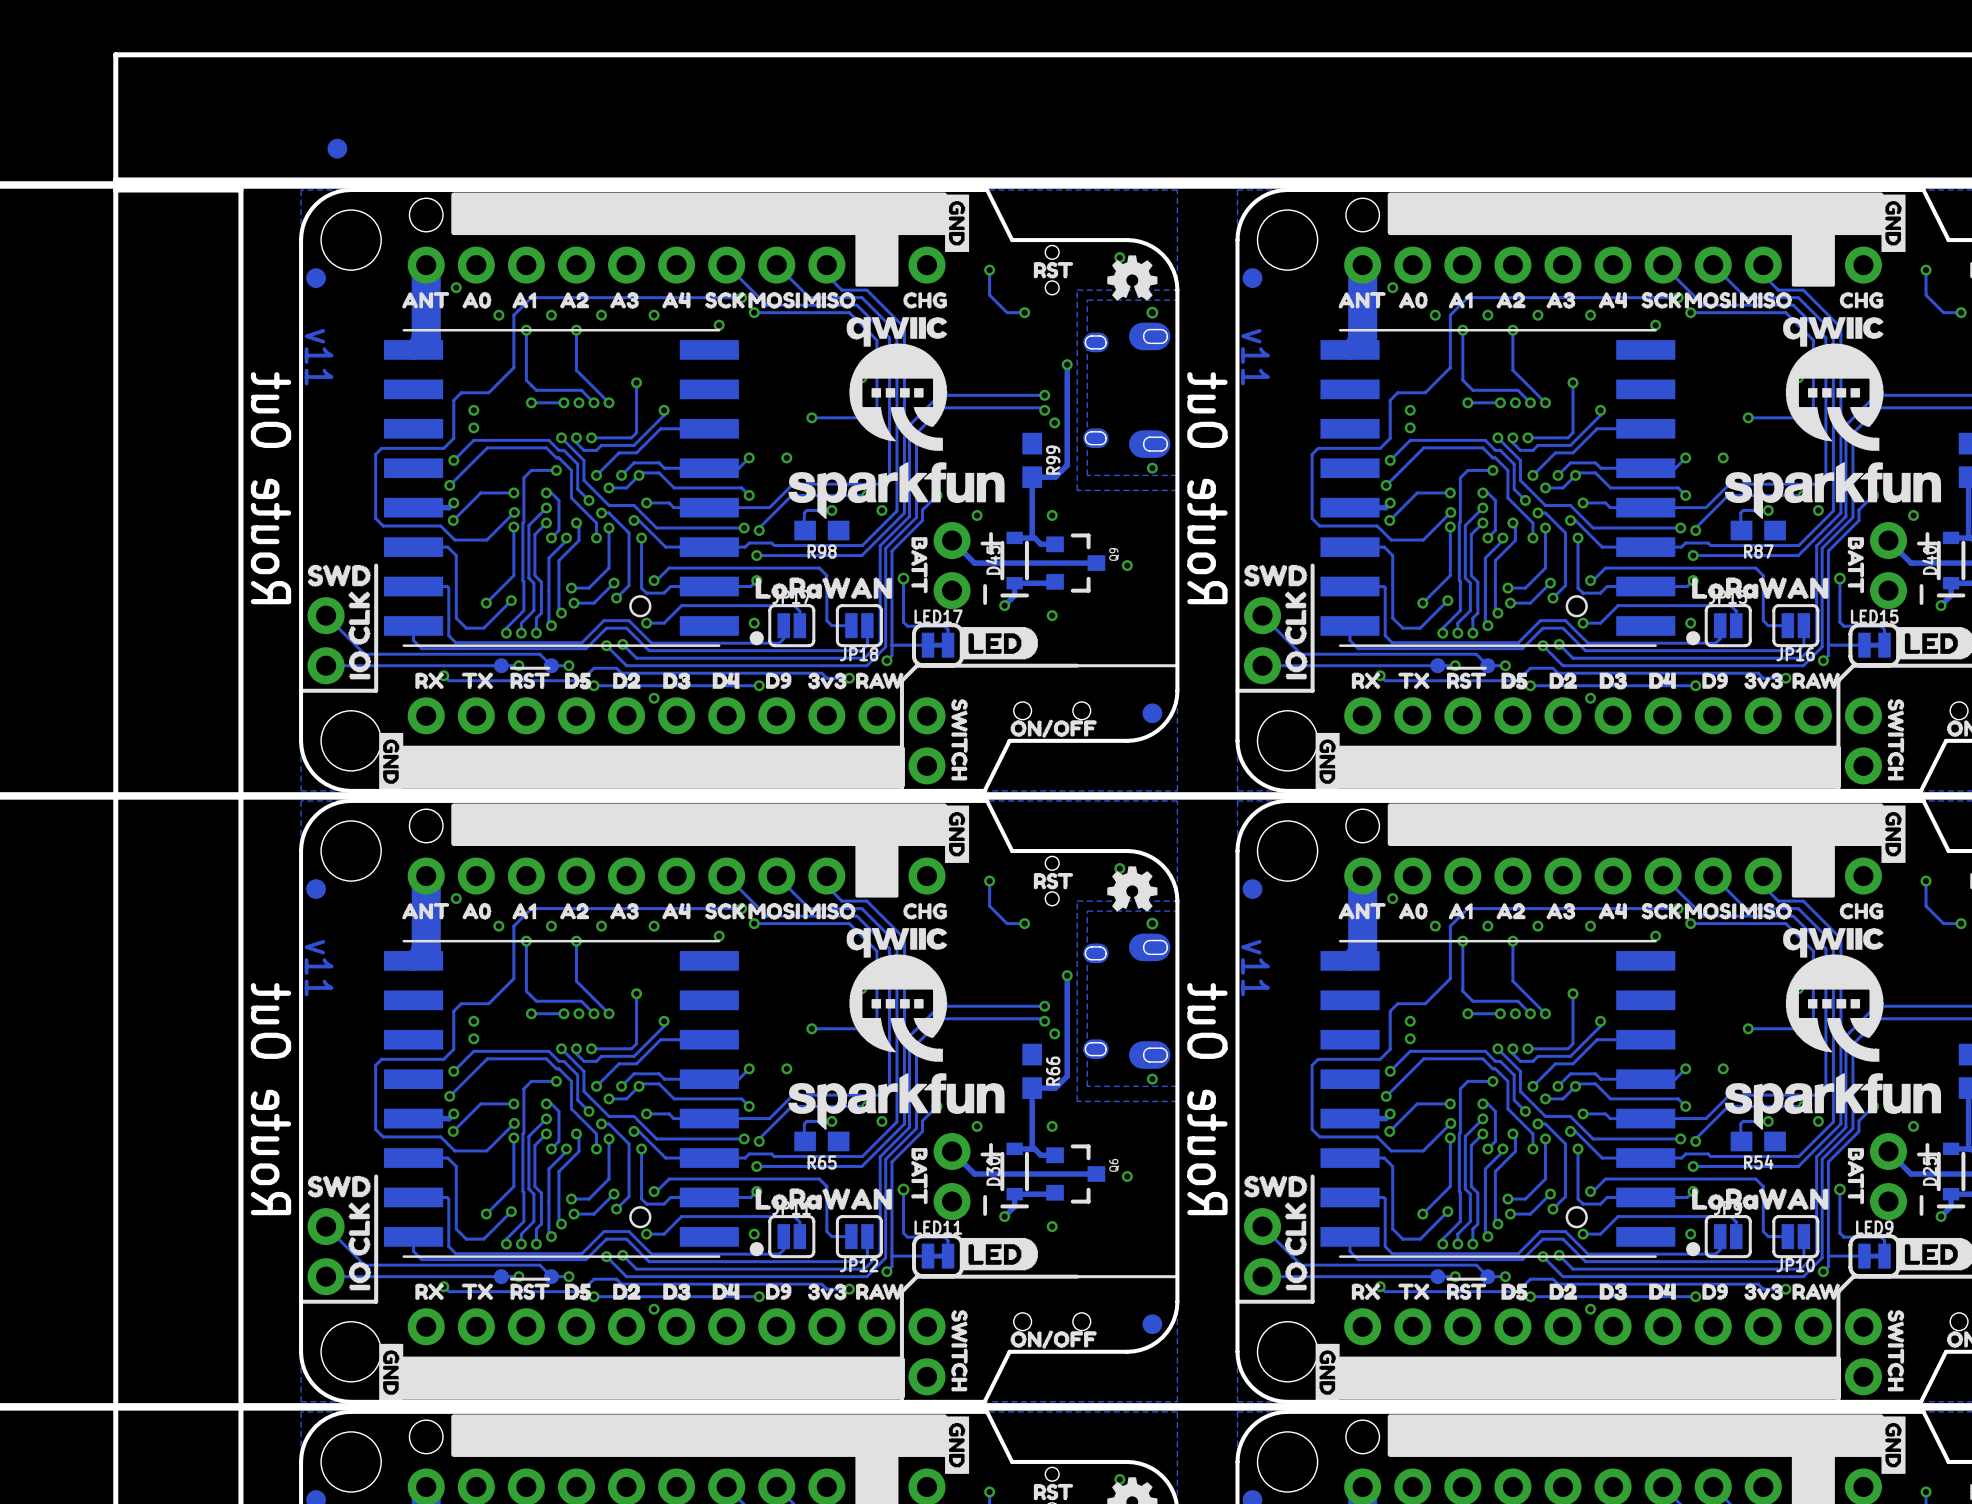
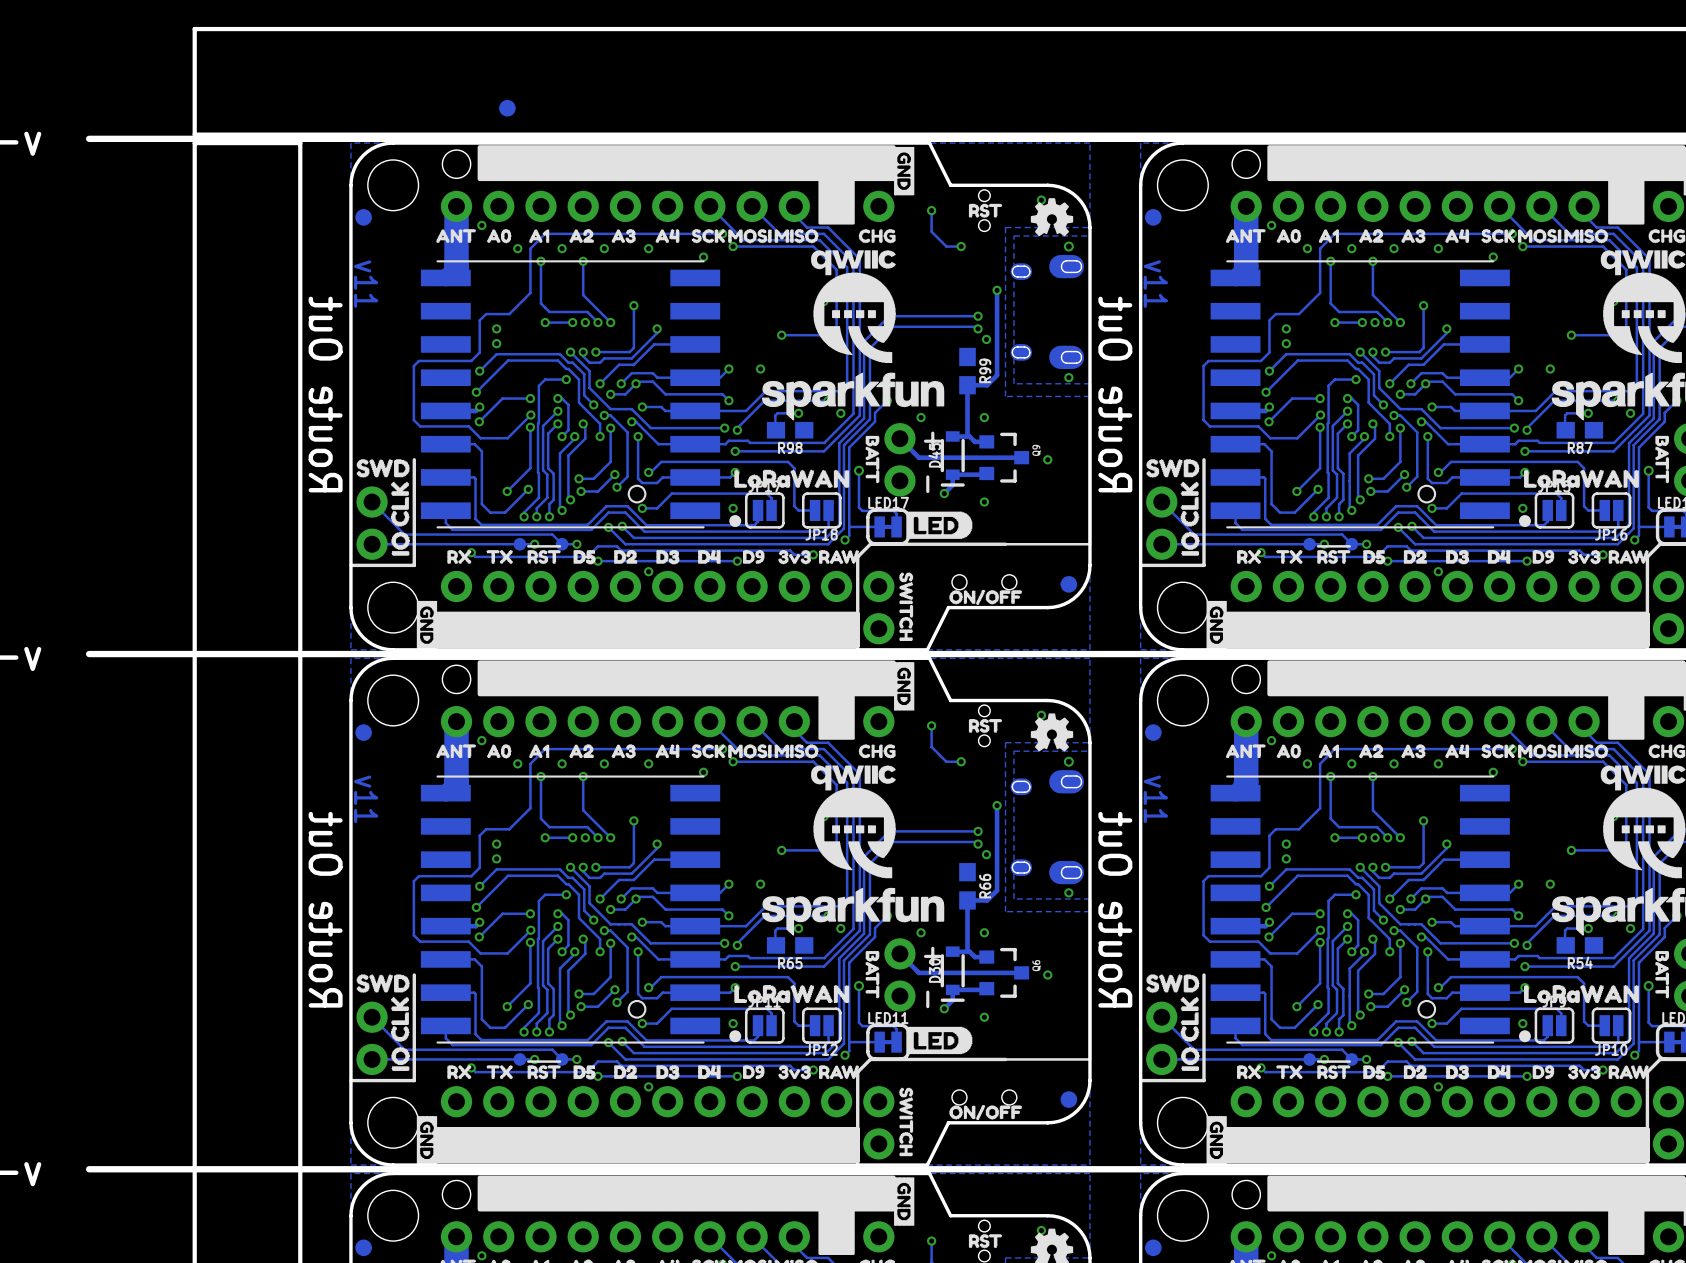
part position: (337, 148) -> (507, 108)

